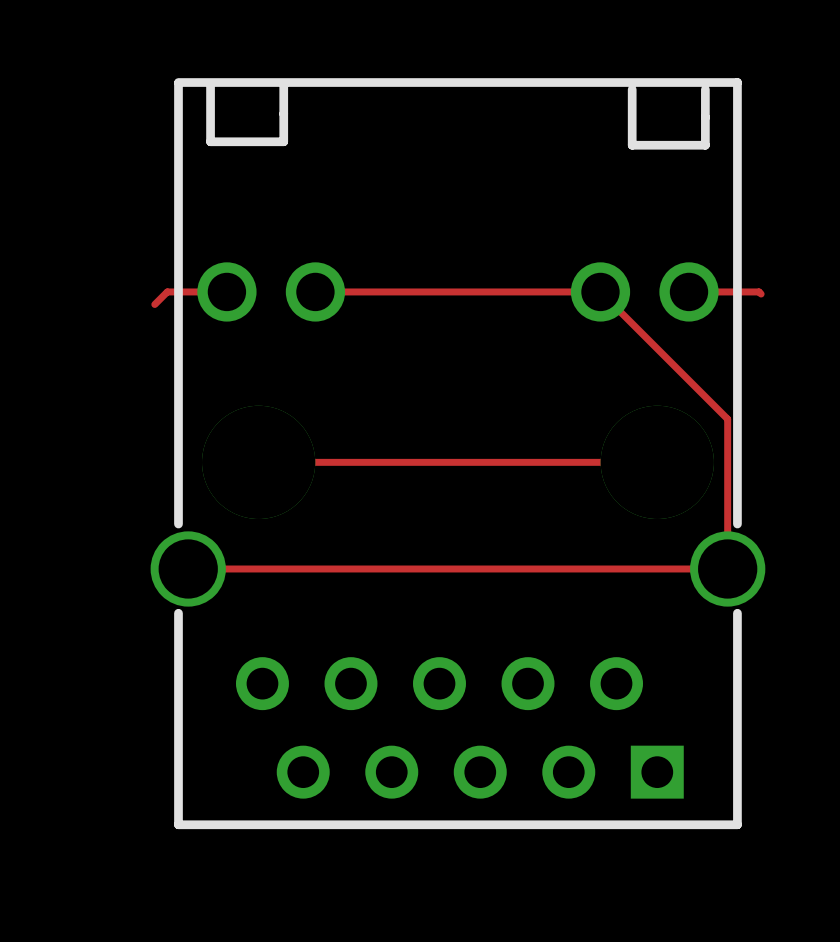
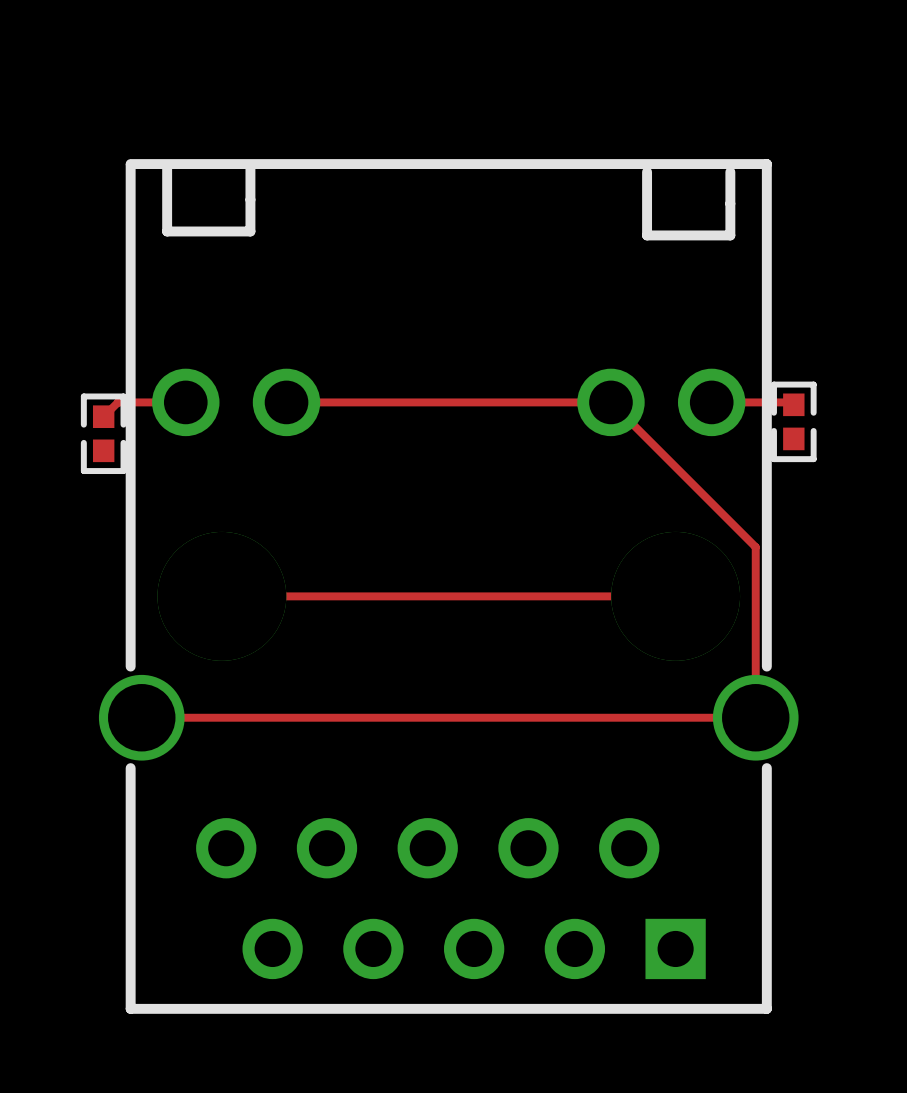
part: none -> (793, 421)
part: none -> (103, 433)

